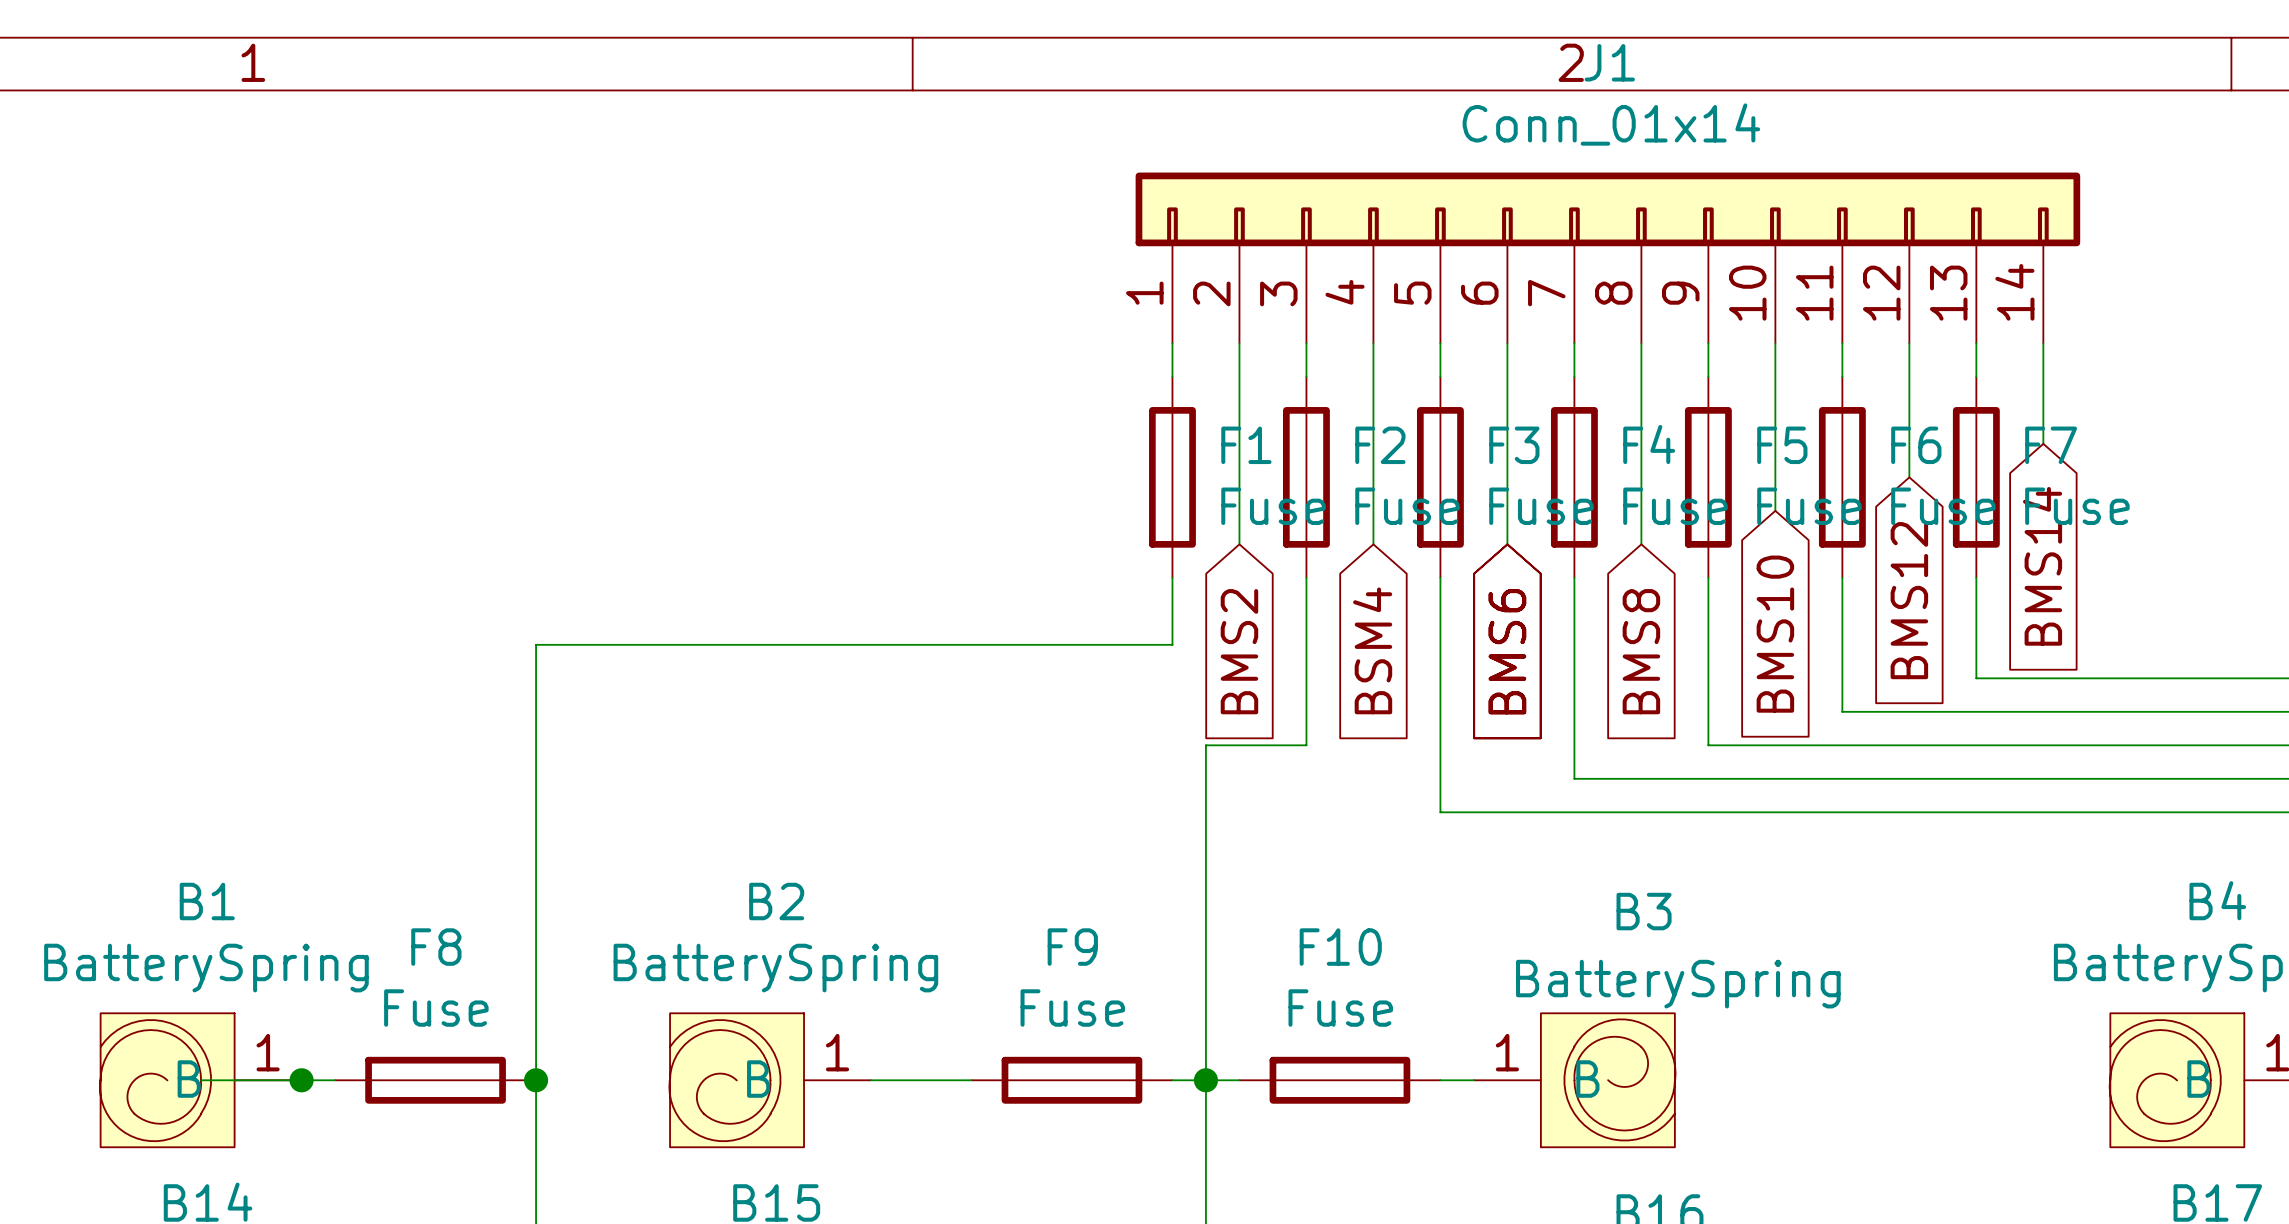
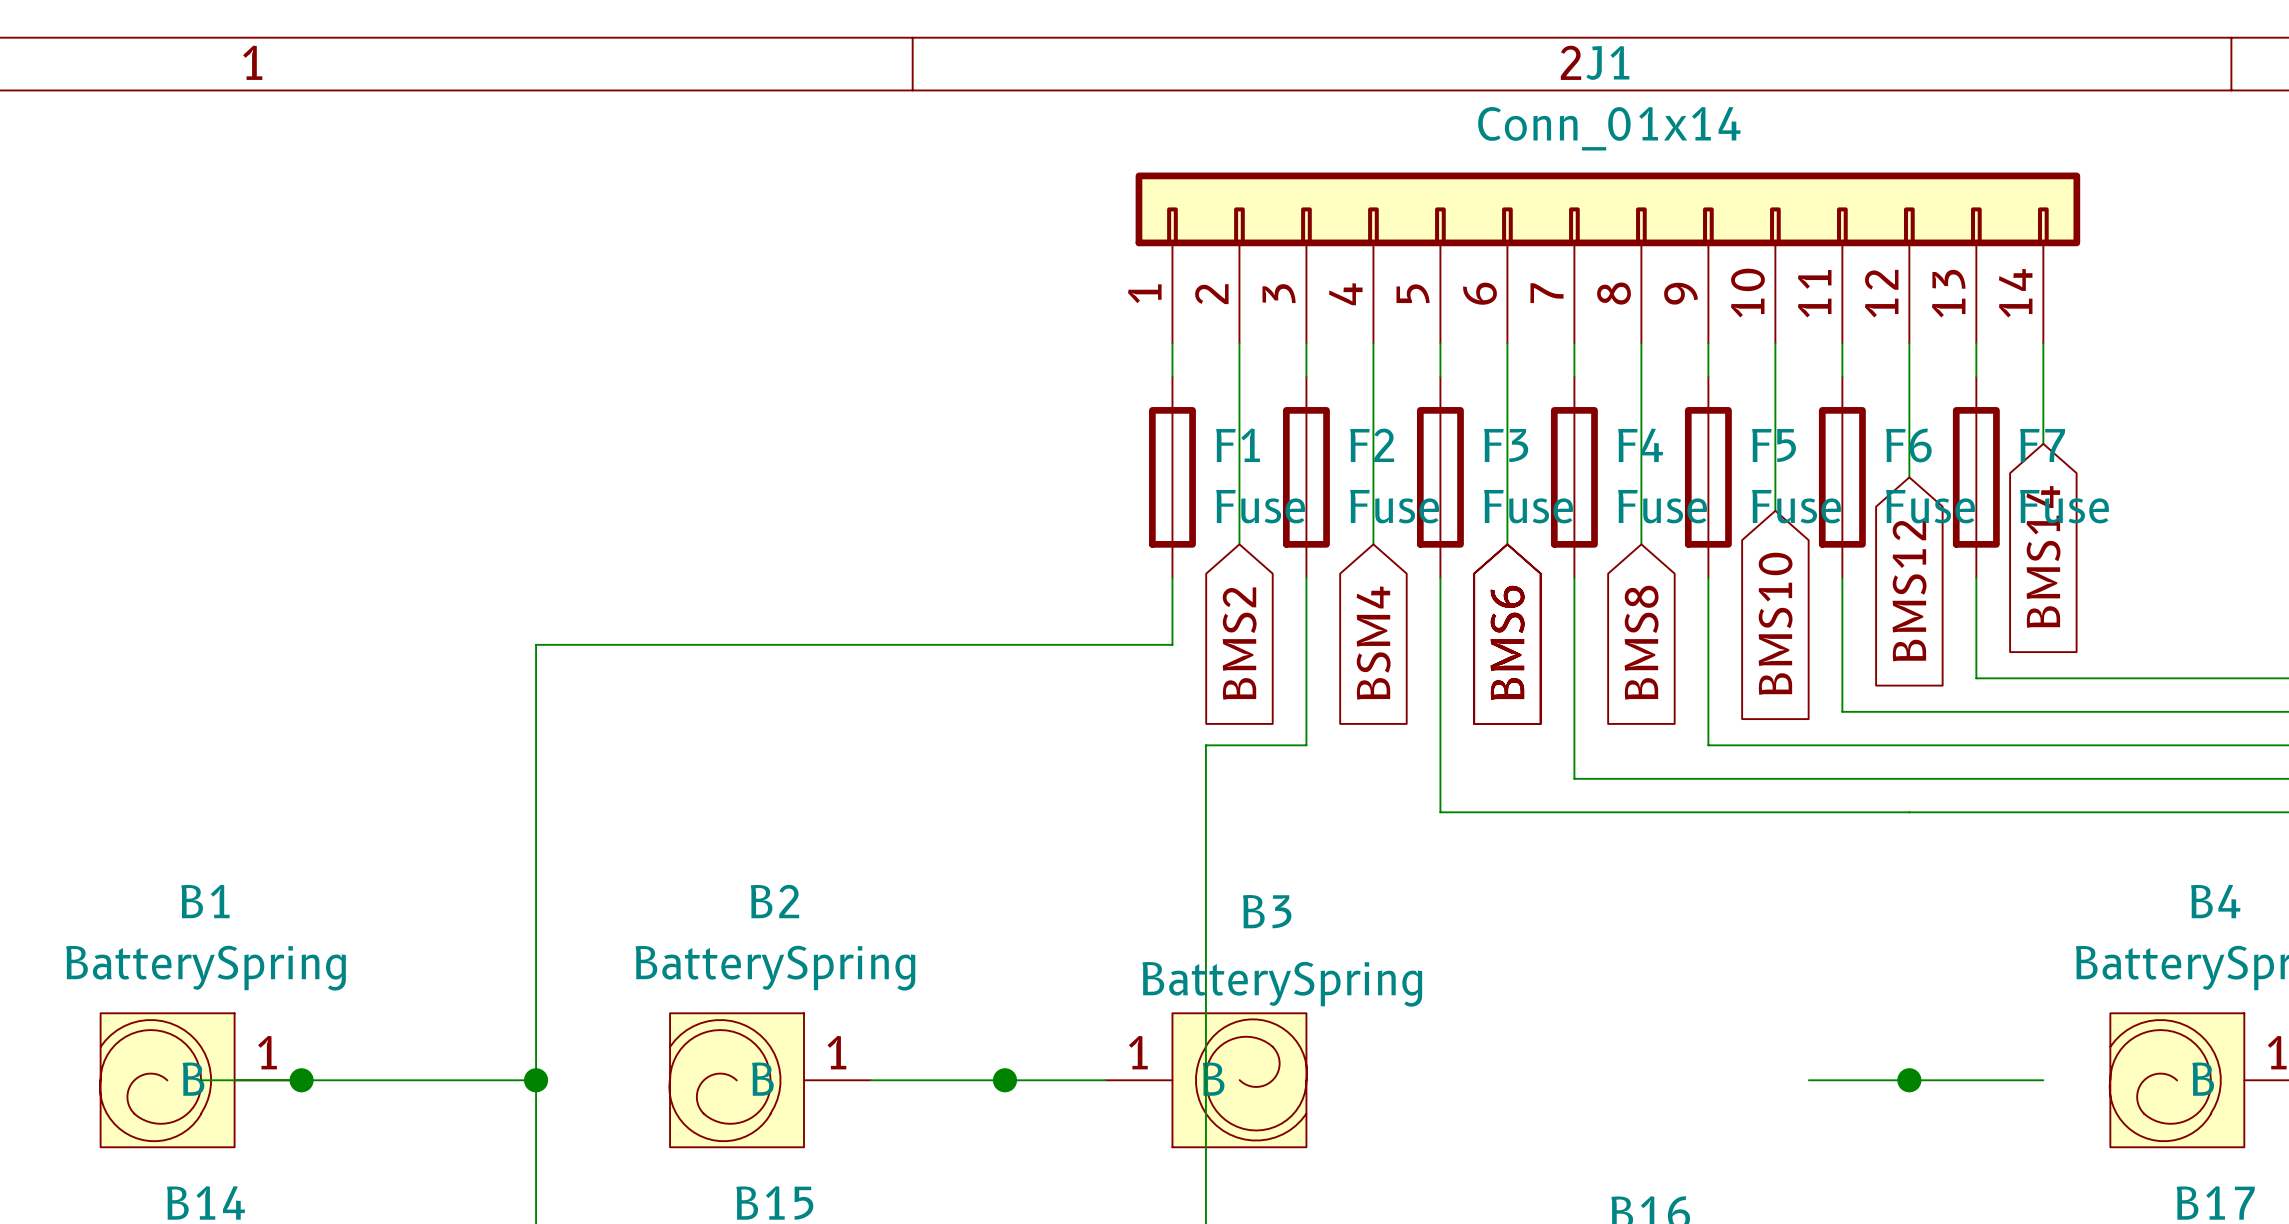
F8: Fuse (435, 1080) -> none
junction: none -> (1004, 1080)
F9: Fuse (1071, 1080) -> none
junction: (1205, 1080) -> none
F10: Fuse (1339, 1080) -> none
wire: (1440, 1080) (1473, 1080) -> none
B3 position: (1574, 1080) -> (1206, 1080)
wire: none -> (1808, 1080) (2043, 1080)
junction: none -> (1909, 1080)

